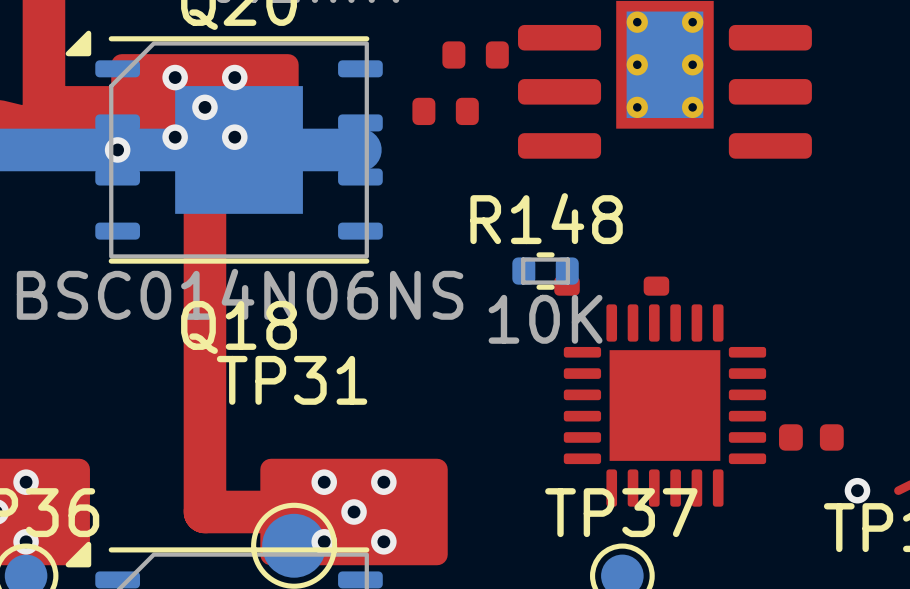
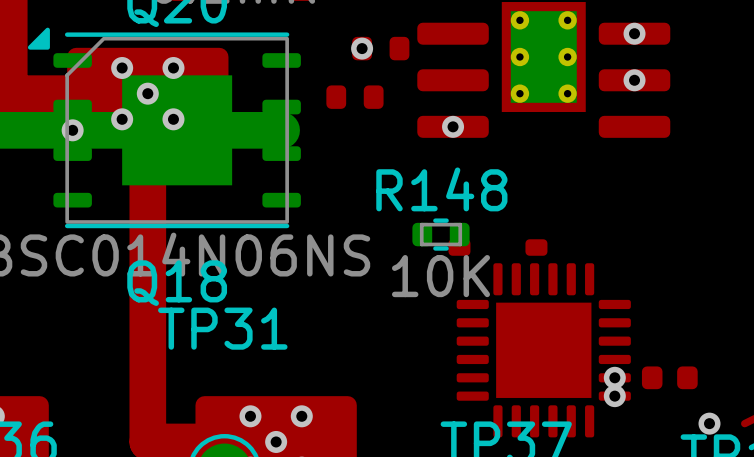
via: none -> (634, 33)
via: none -> (362, 48)
via: none -> (634, 80)
via: none -> (453, 126)
via: none -> (614, 377)
via: none -> (614, 396)

